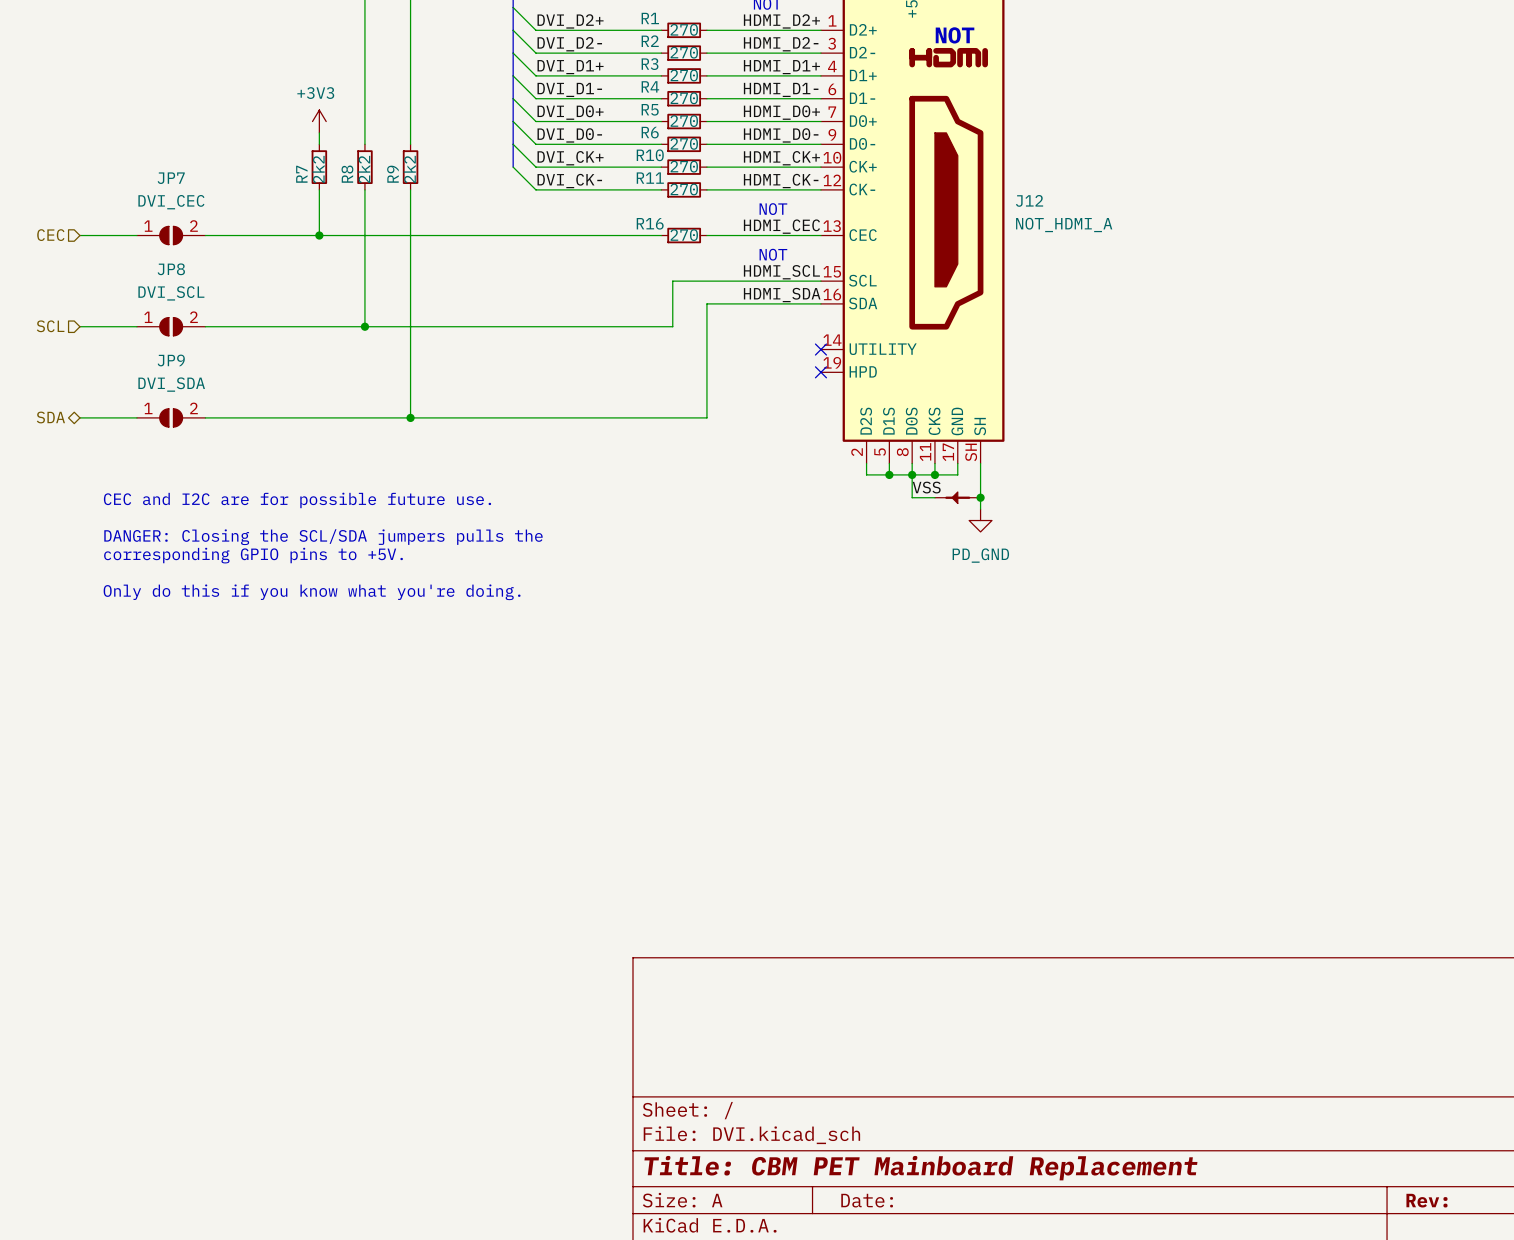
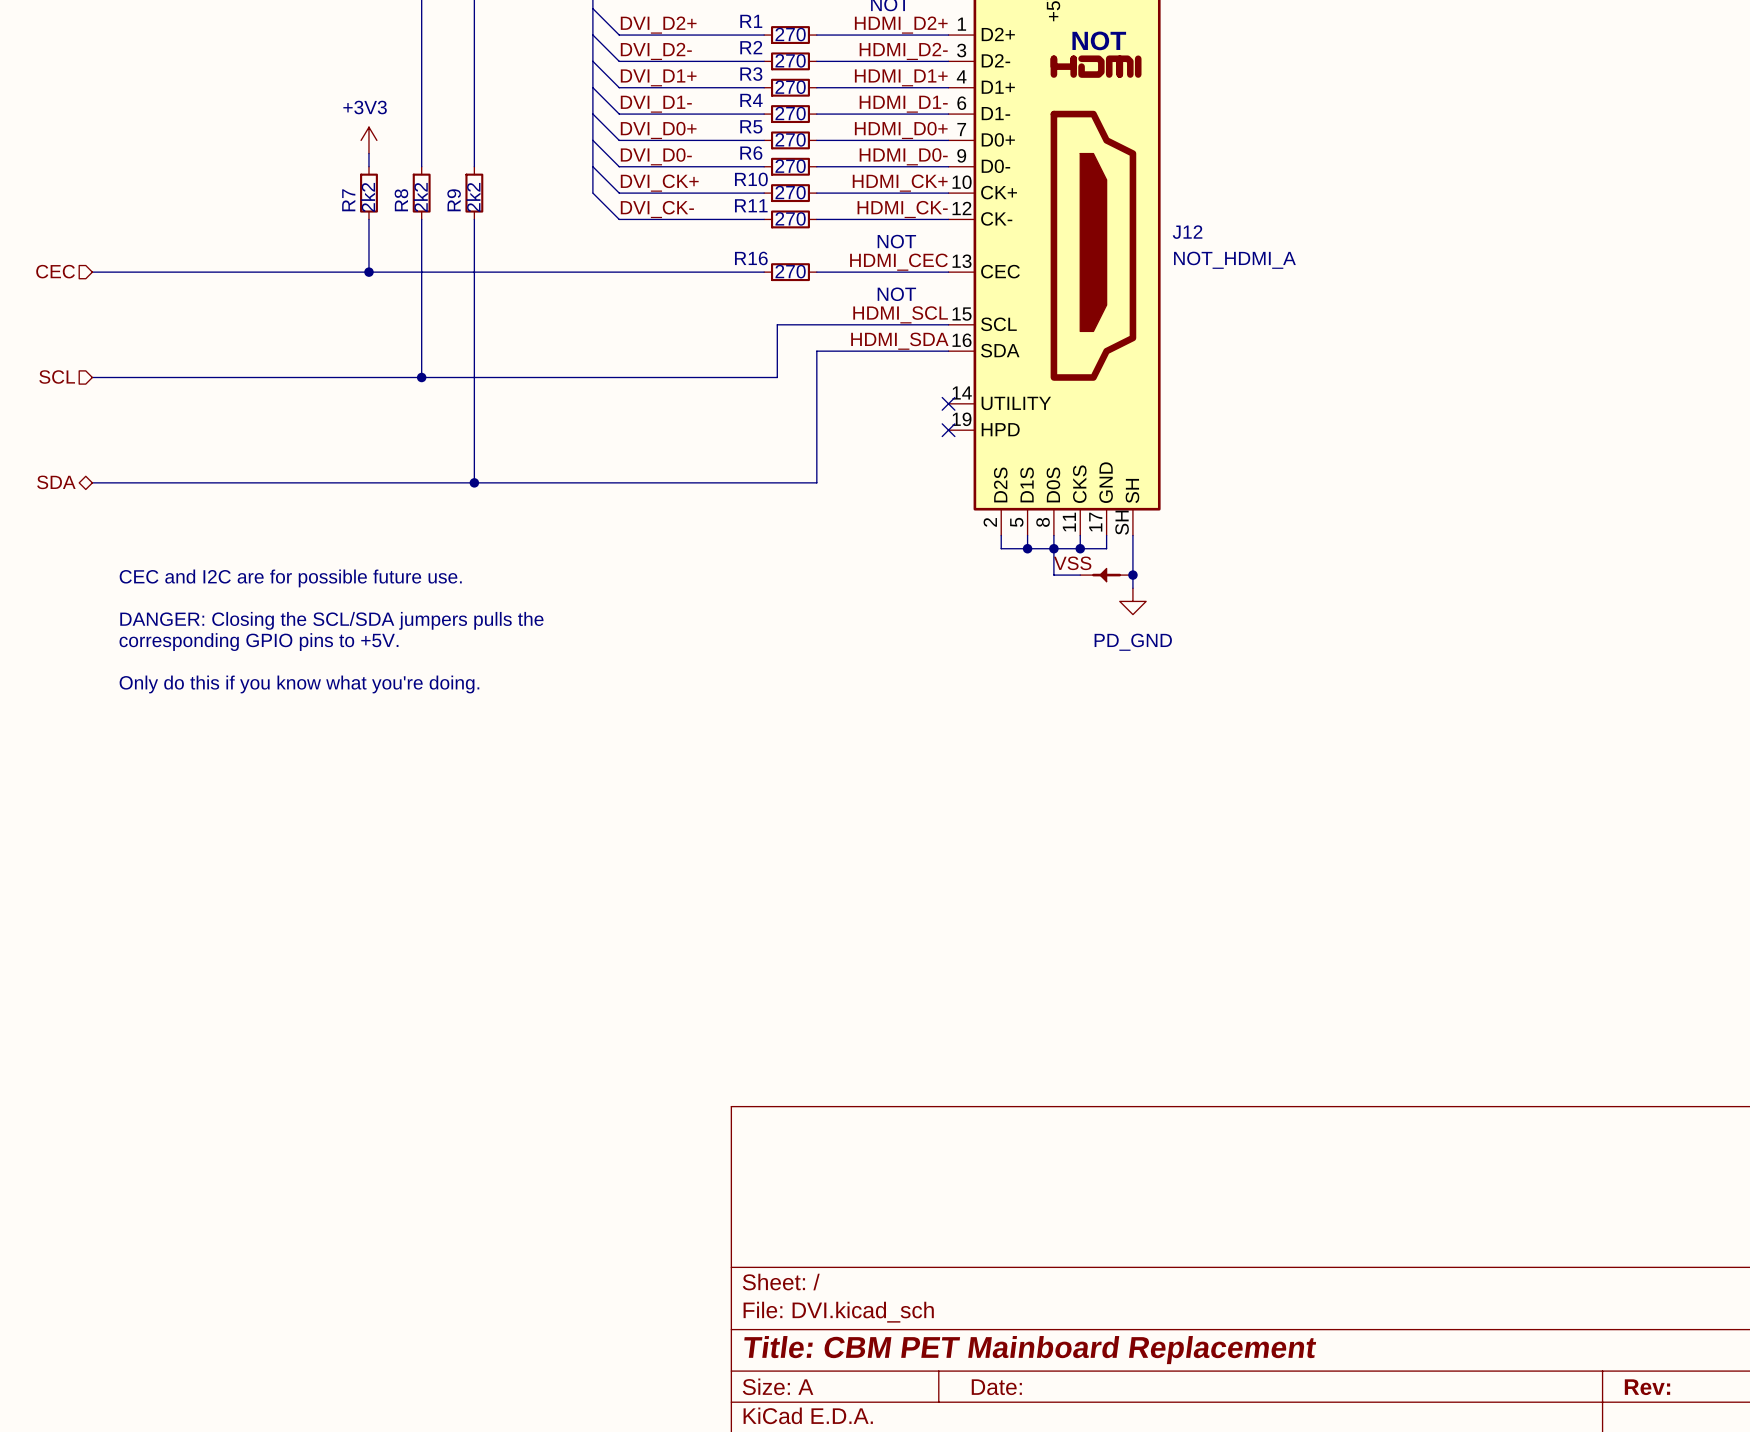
JP7: DVI_CEC (171, 235) -> none
JP8: DVI_SCL (171, 326) -> none
JP9: DVI_SDA (171, 417) -> none

